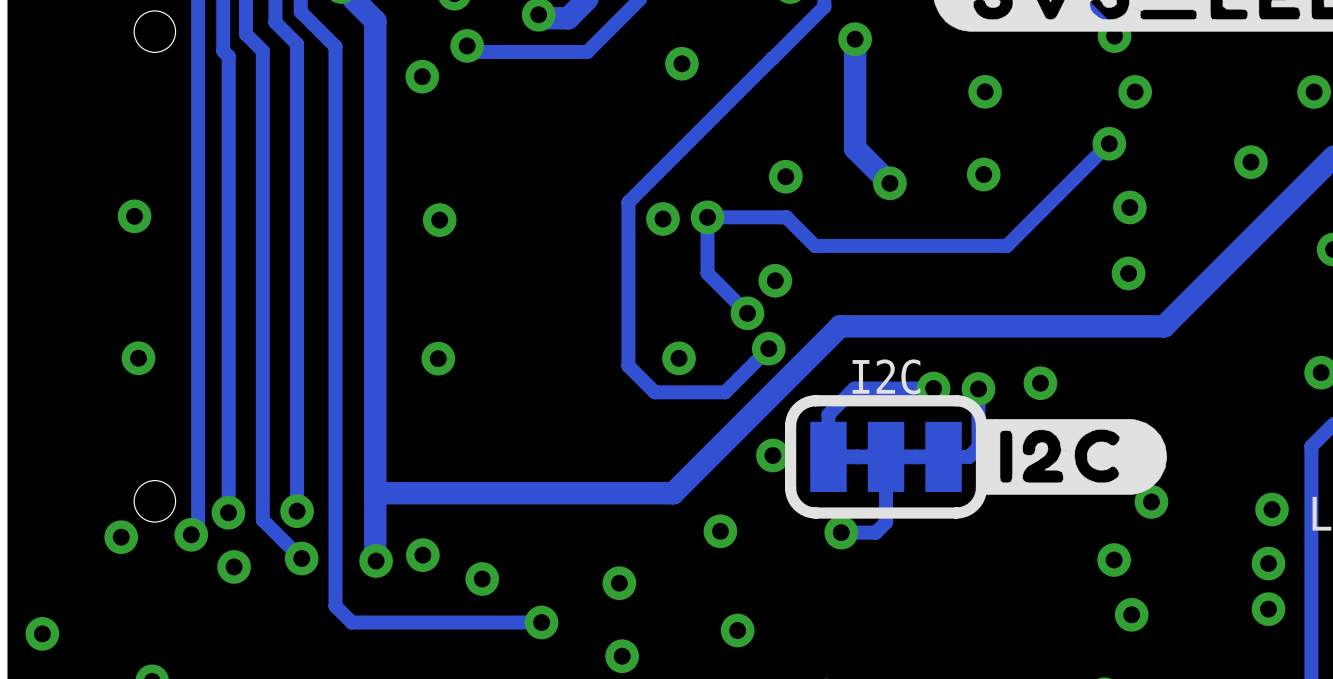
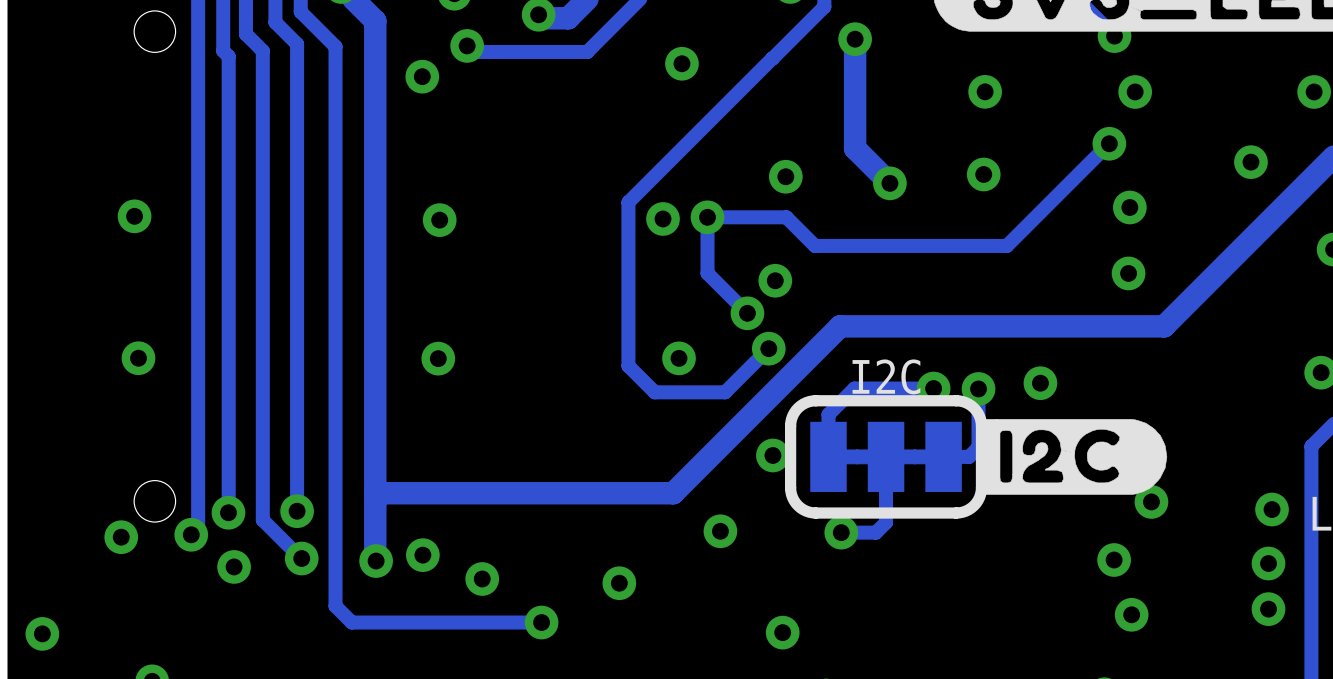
via position: (737, 630) -> (782, 632)
via: (622, 656) -> none

